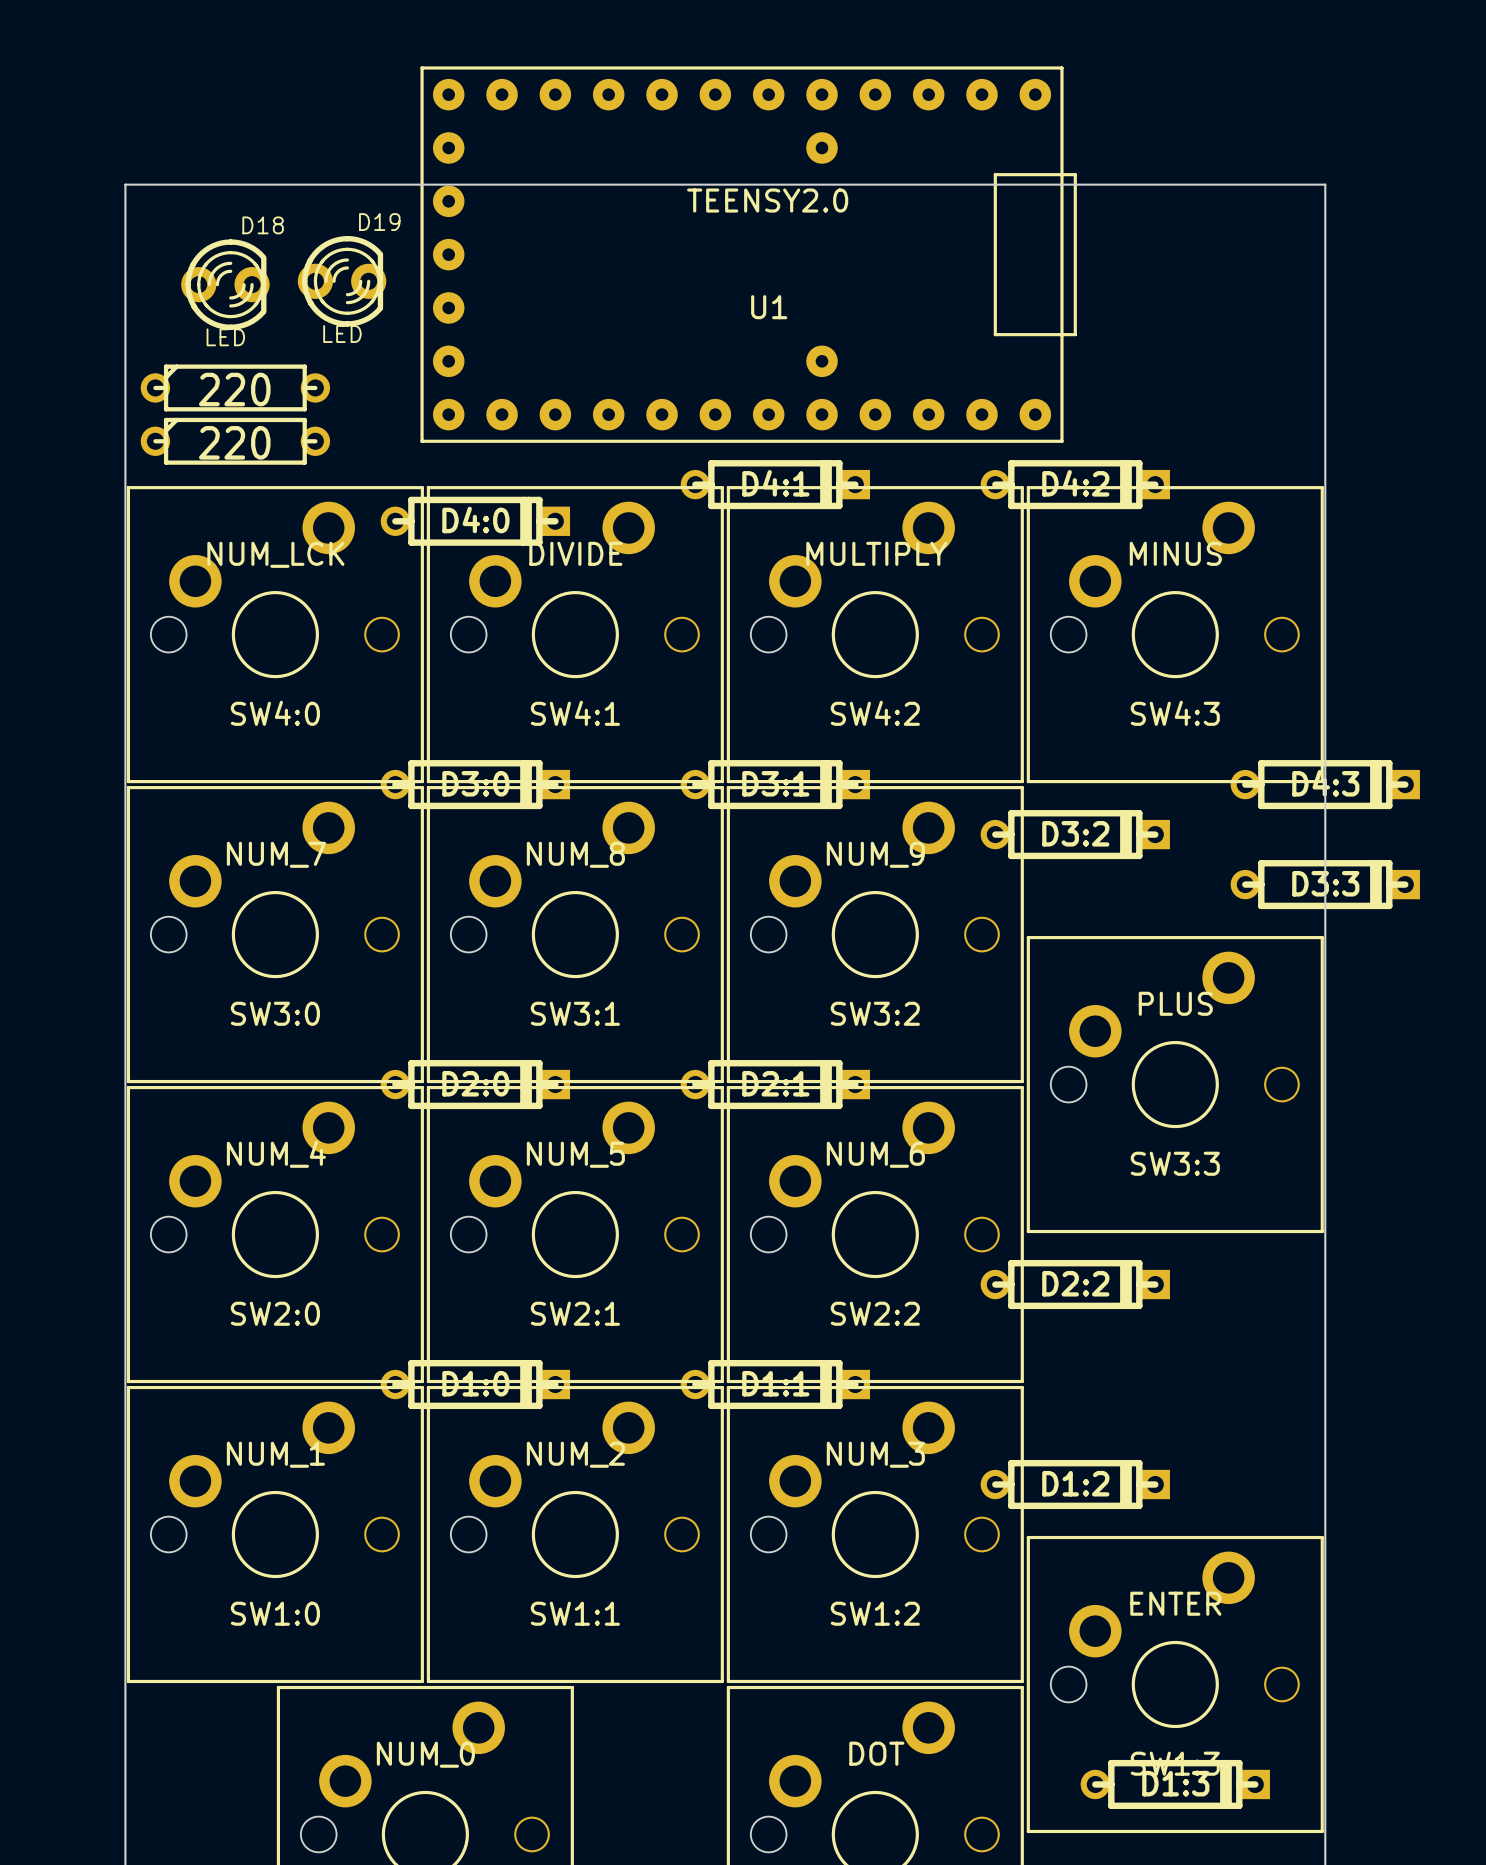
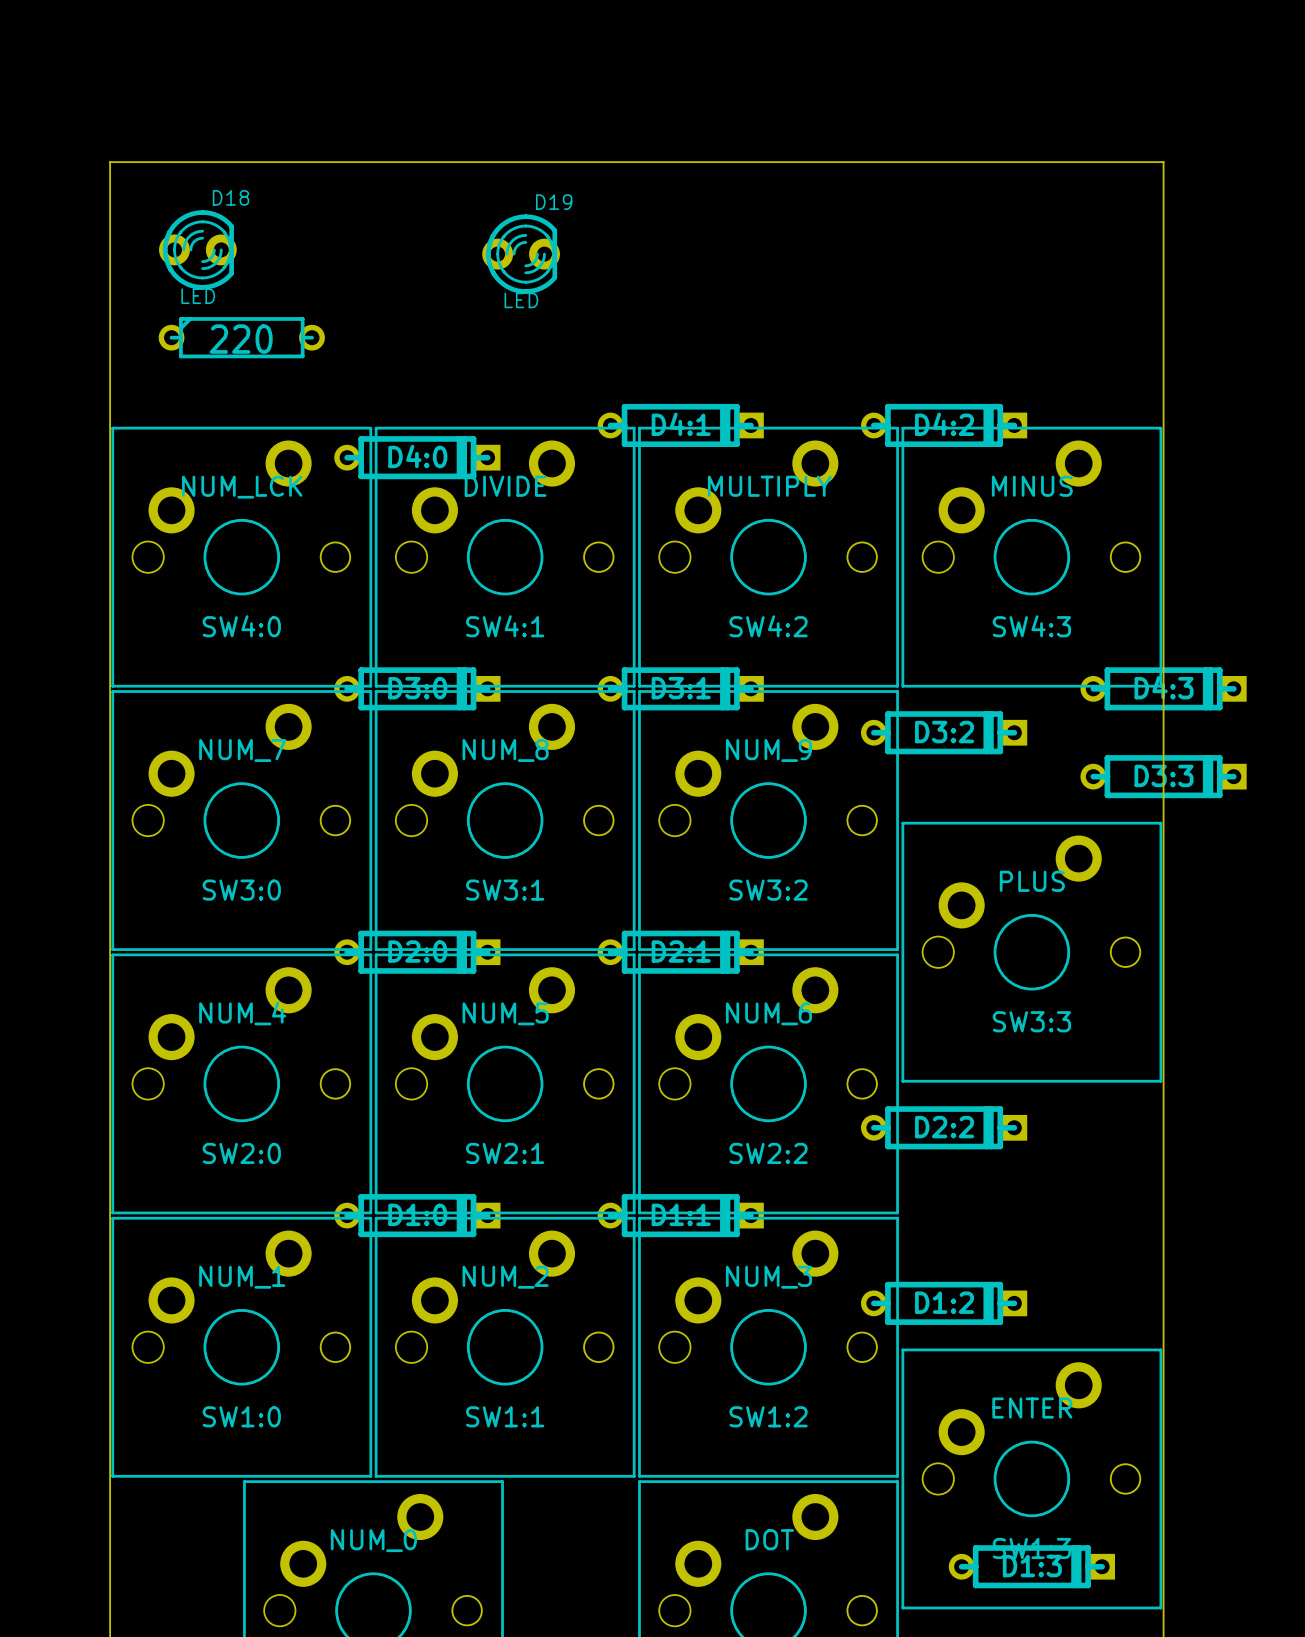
U1: TEENSY2.0 (748, 254) -> none
D19 position: (342, 281) -> (521, 254)
part: none -> 220 (241, 337)
part: 220 (235, 387) -> none
part: 220 (235, 441) -> none

